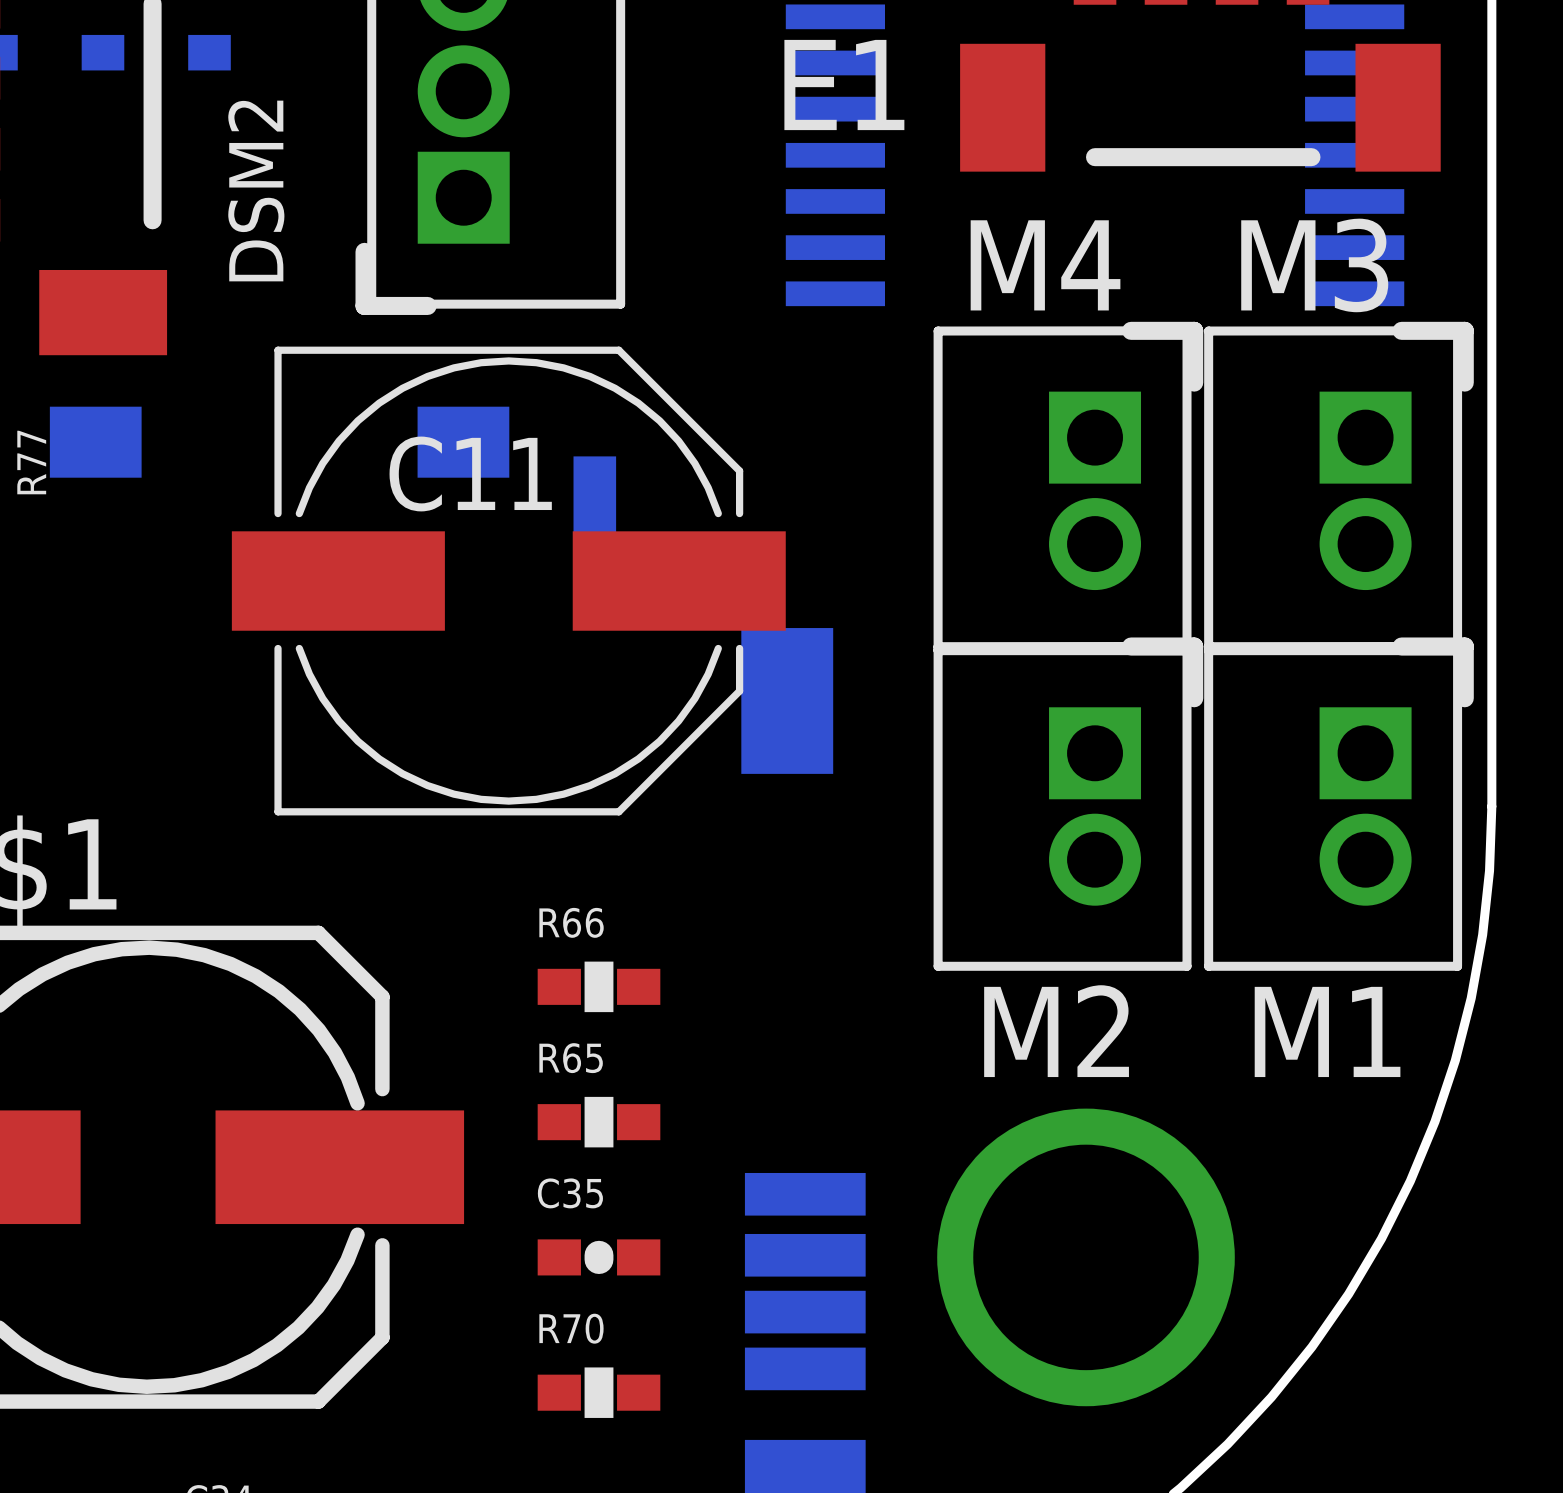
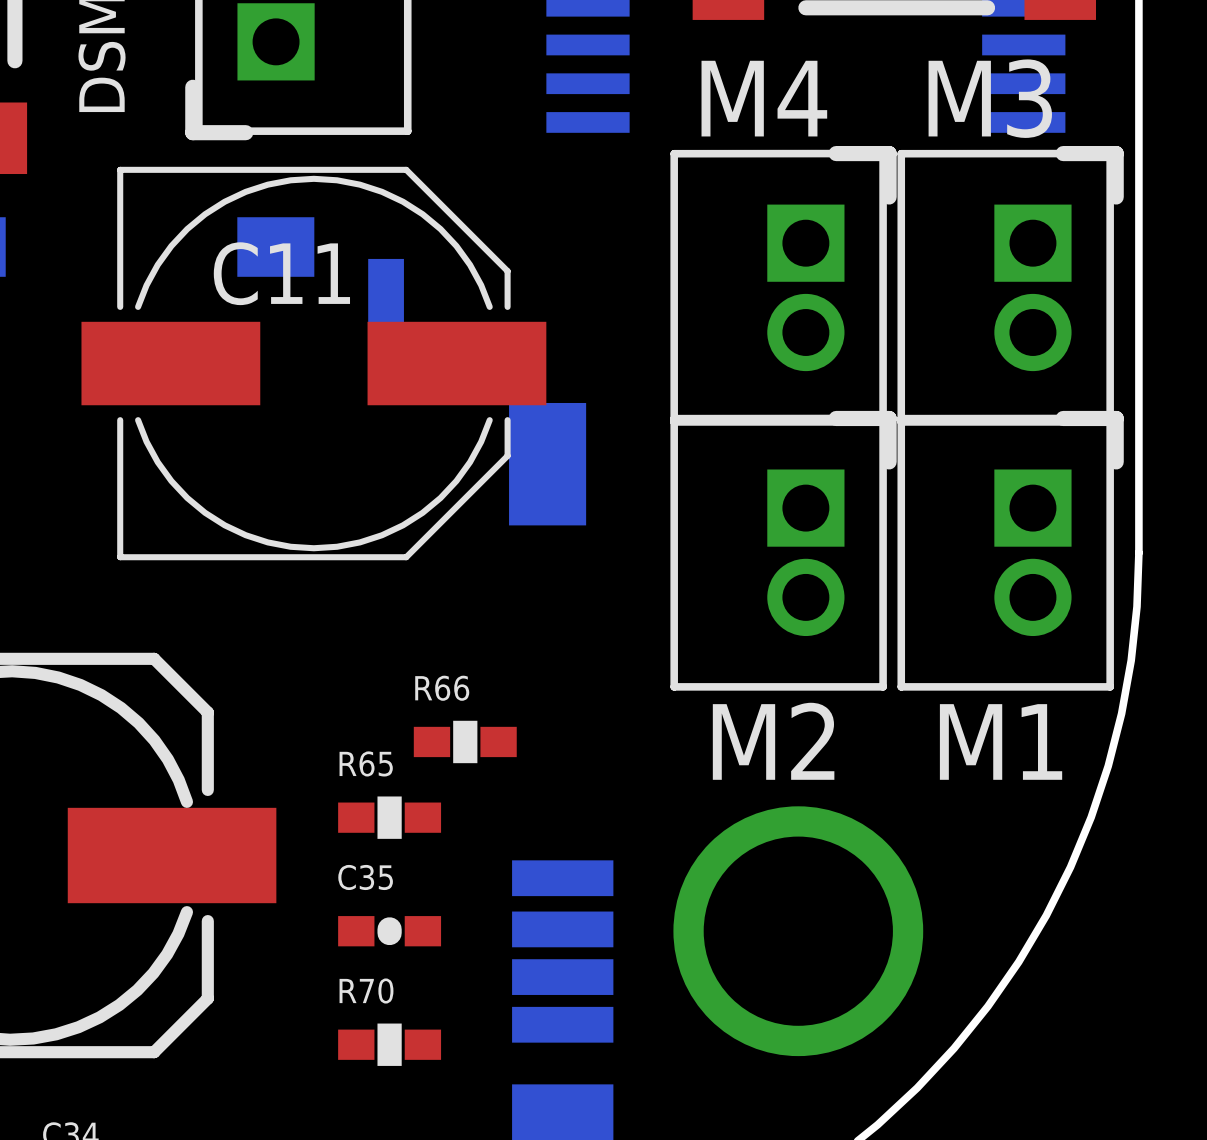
R66 position: (599, 986) -> (465, 741)

